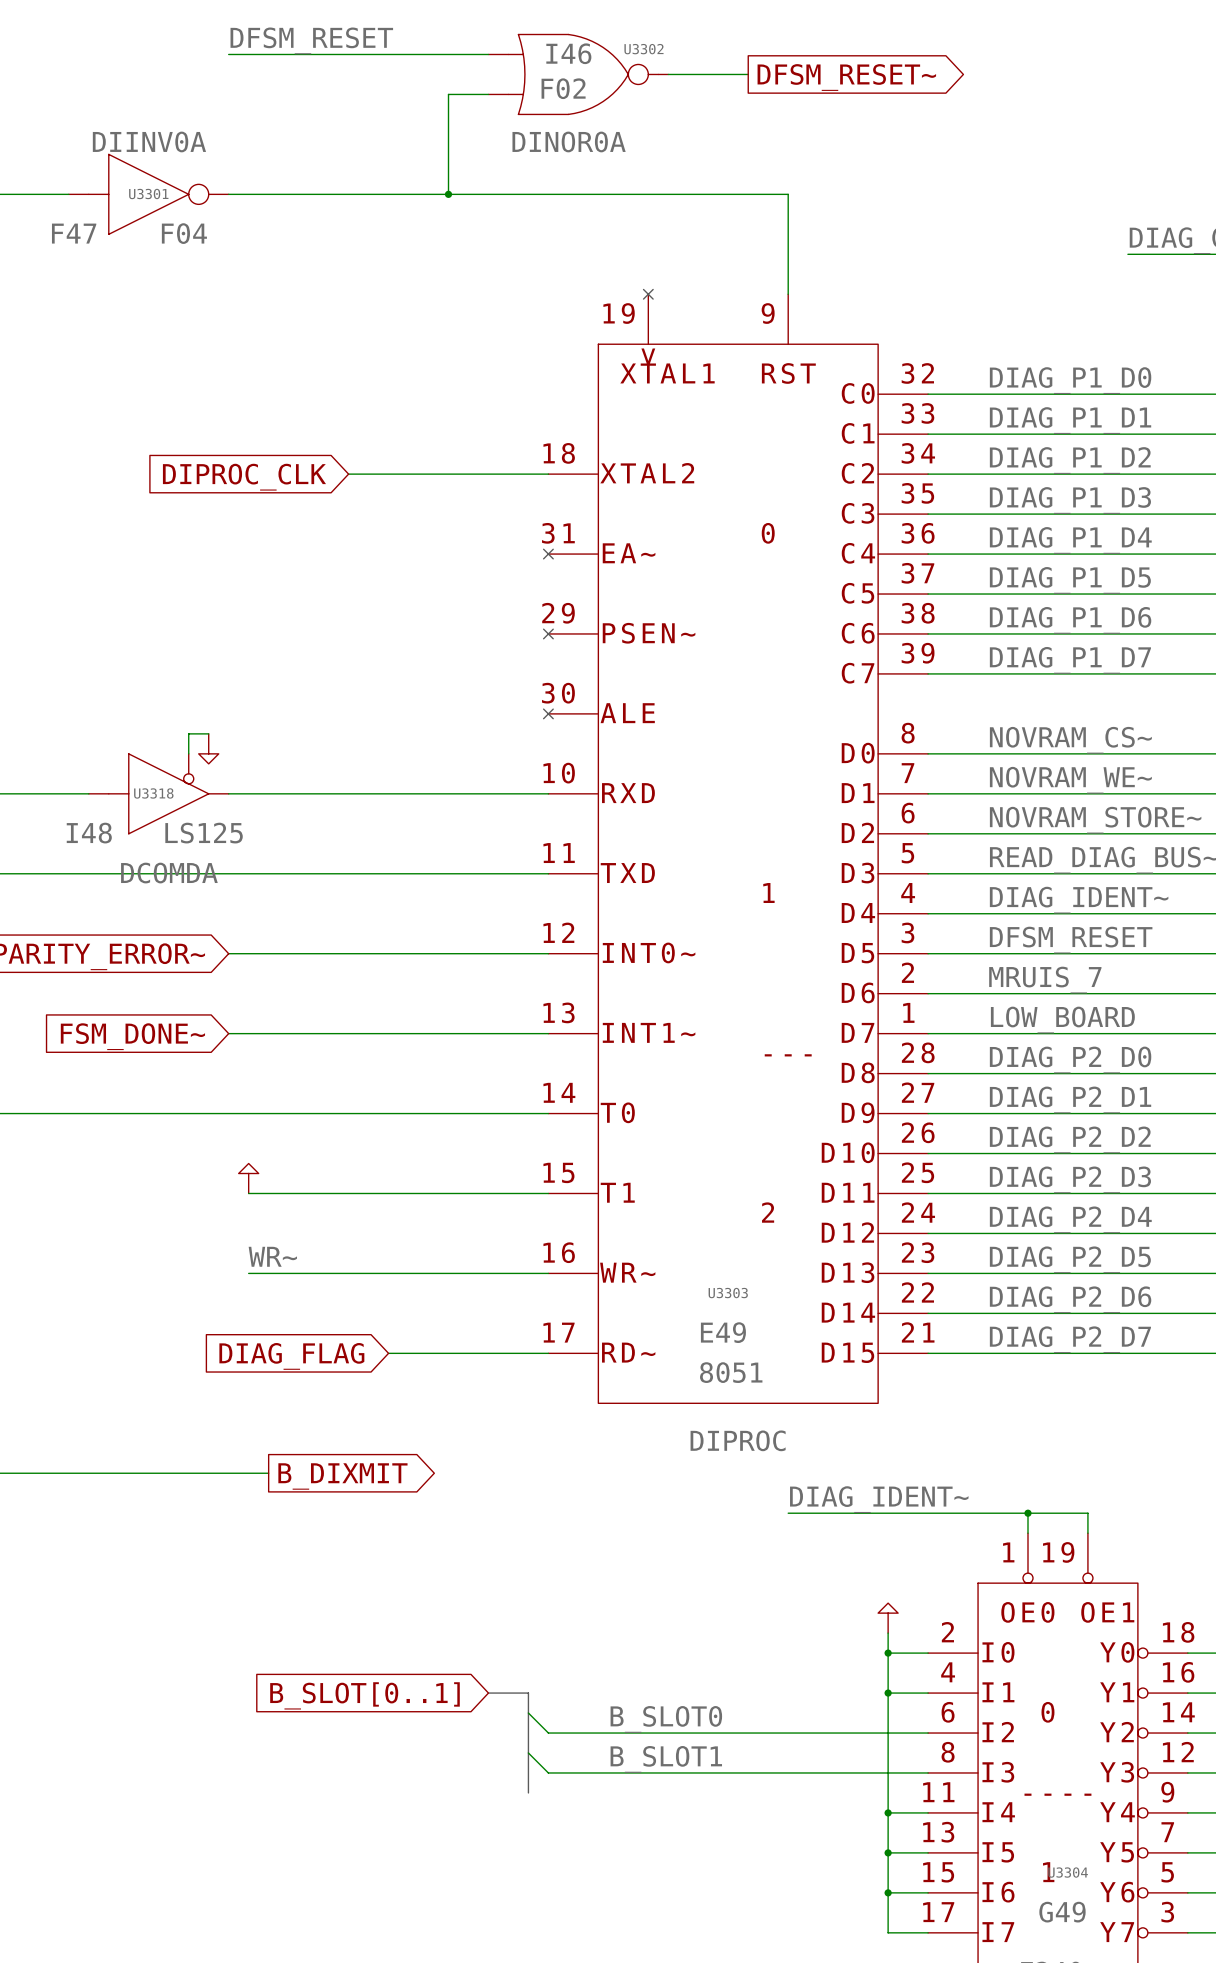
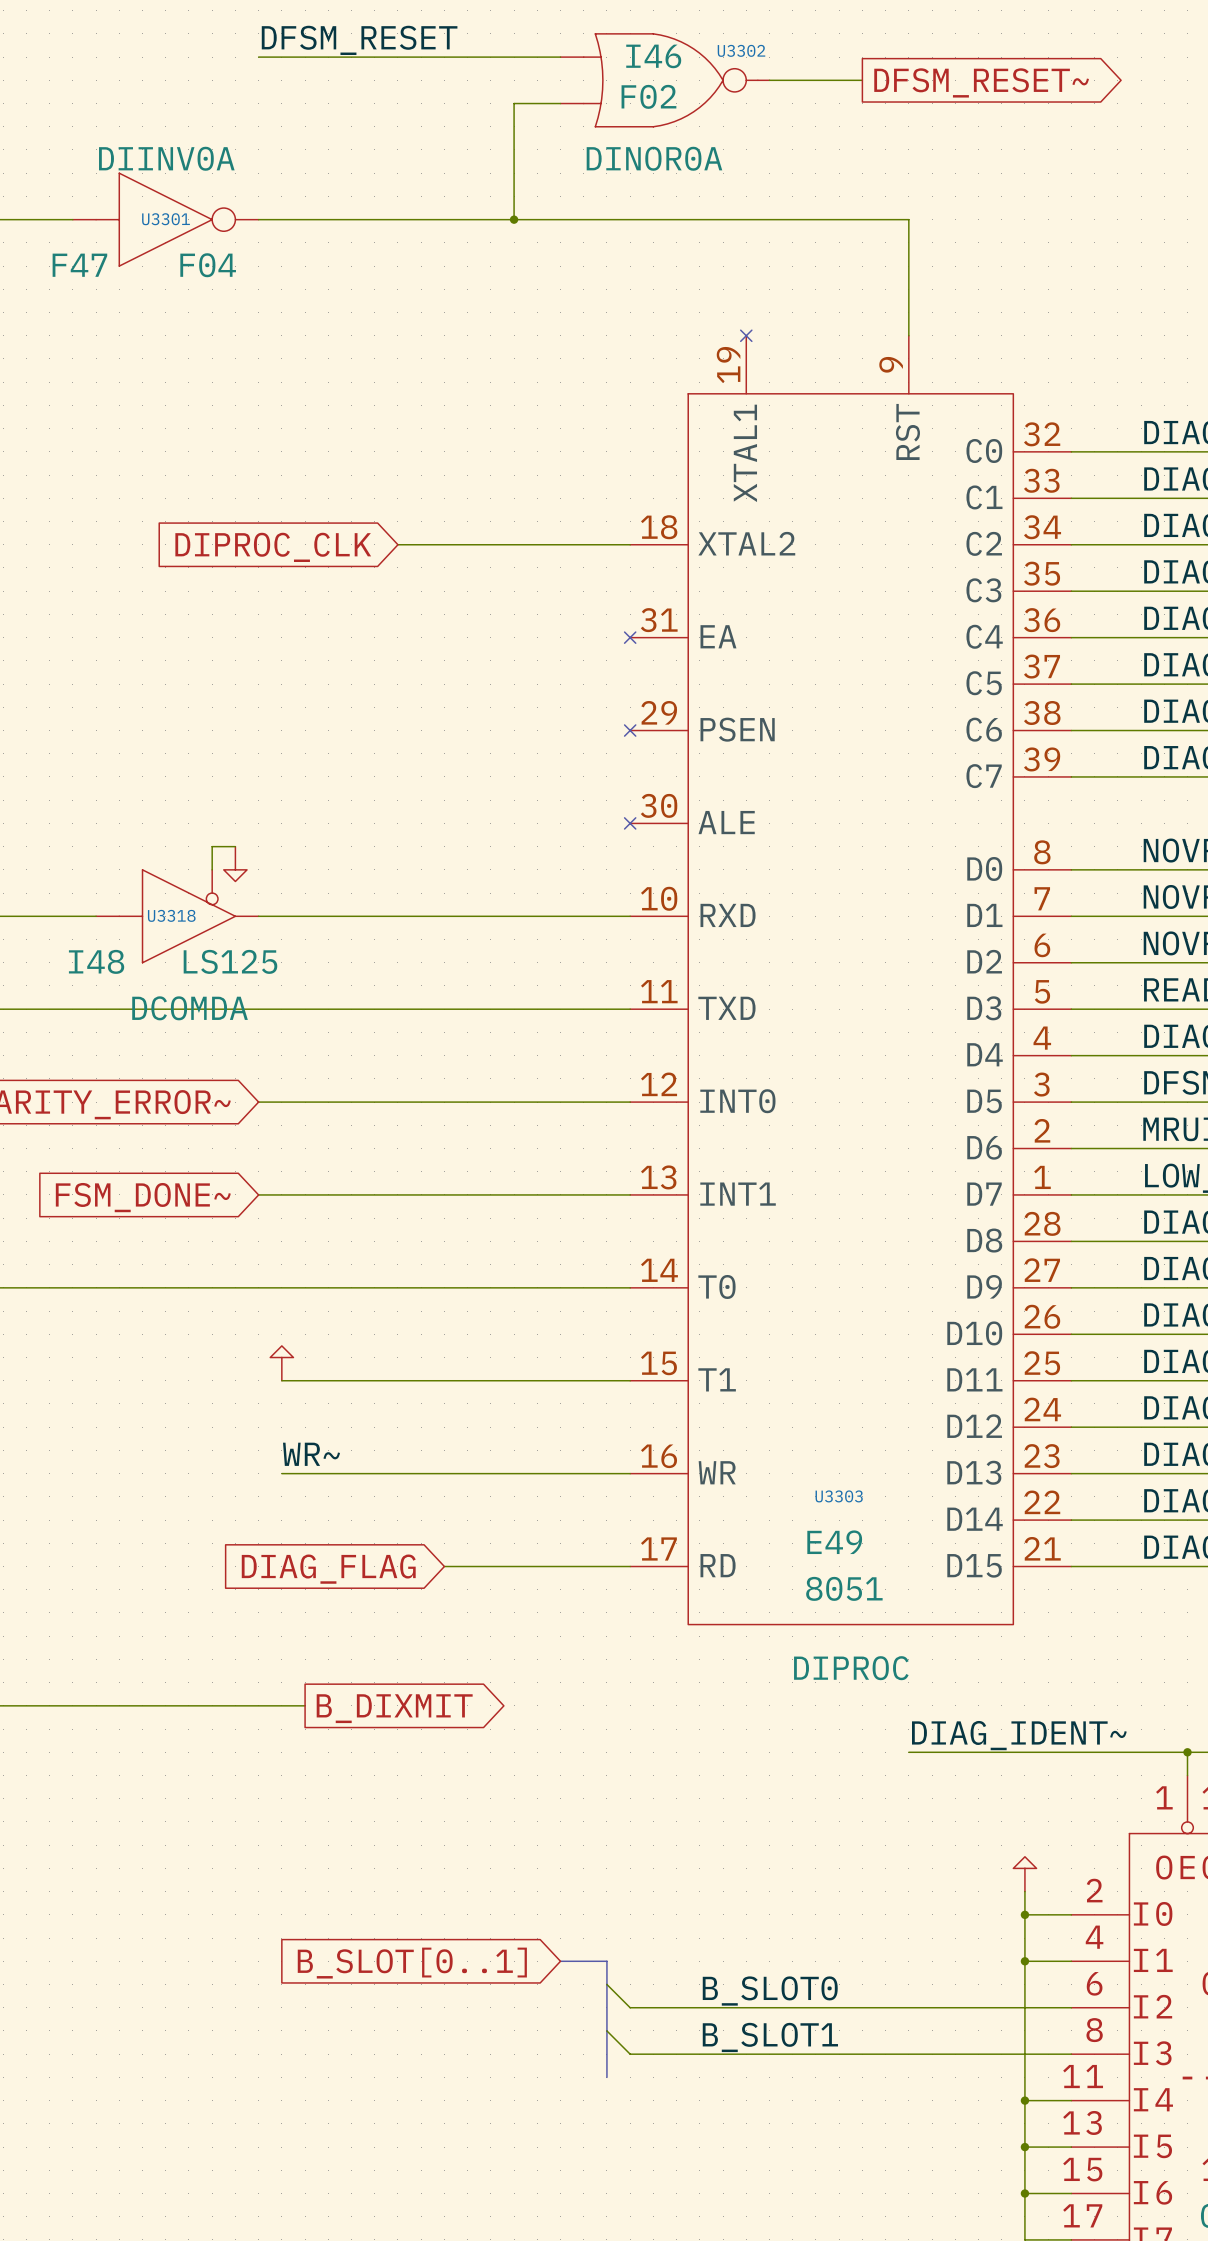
U3303 symbol: [548, 294, 929, 1404] -> [630, 335, 1072, 1625]

